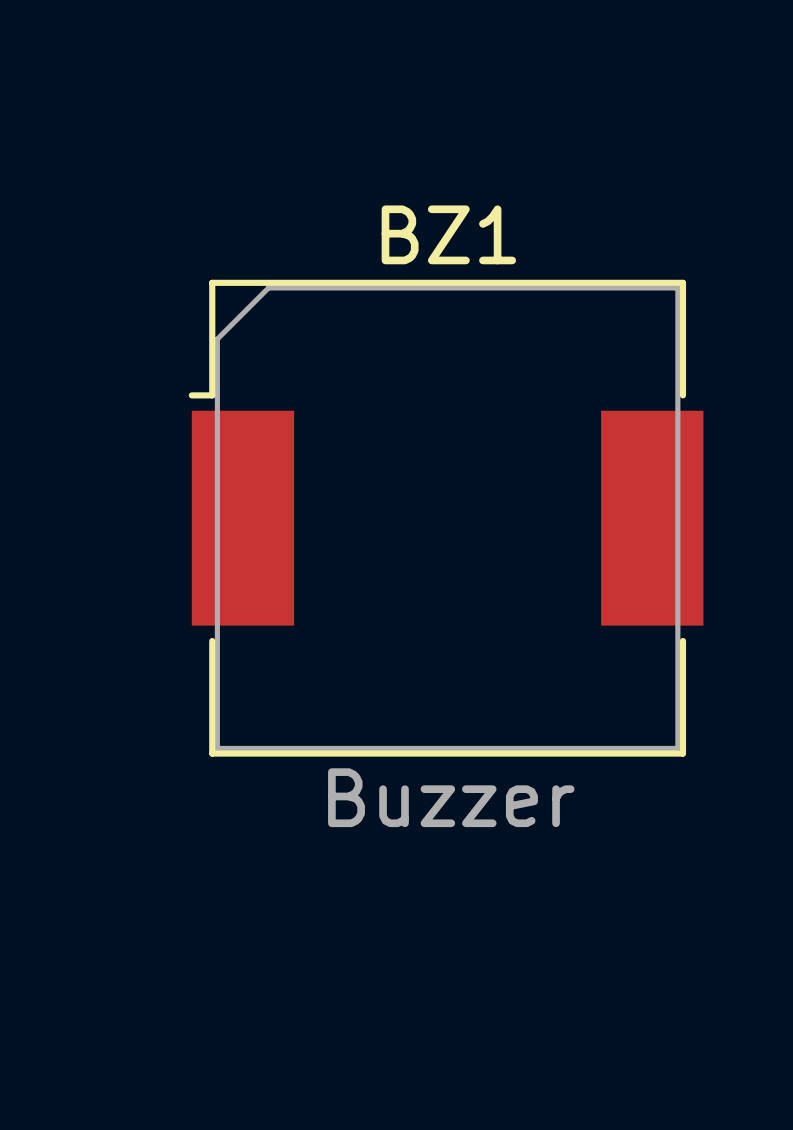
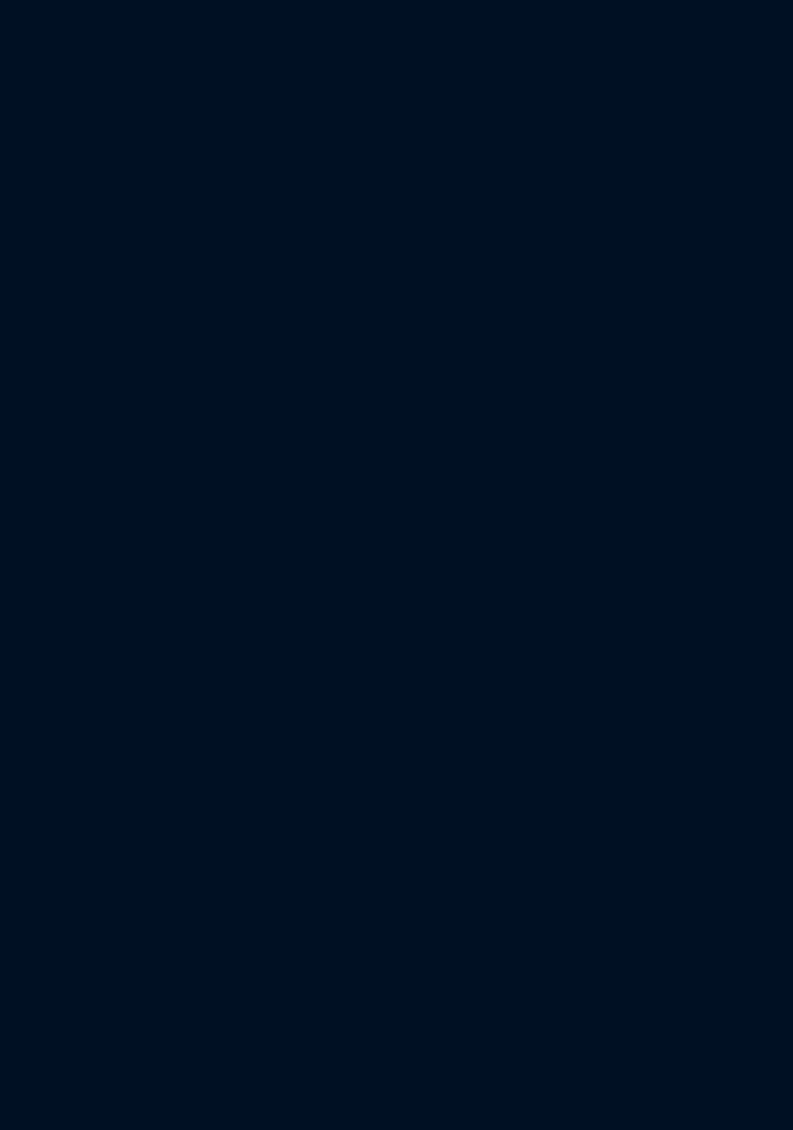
BZ1: Buzzer (446, 518) -> none

